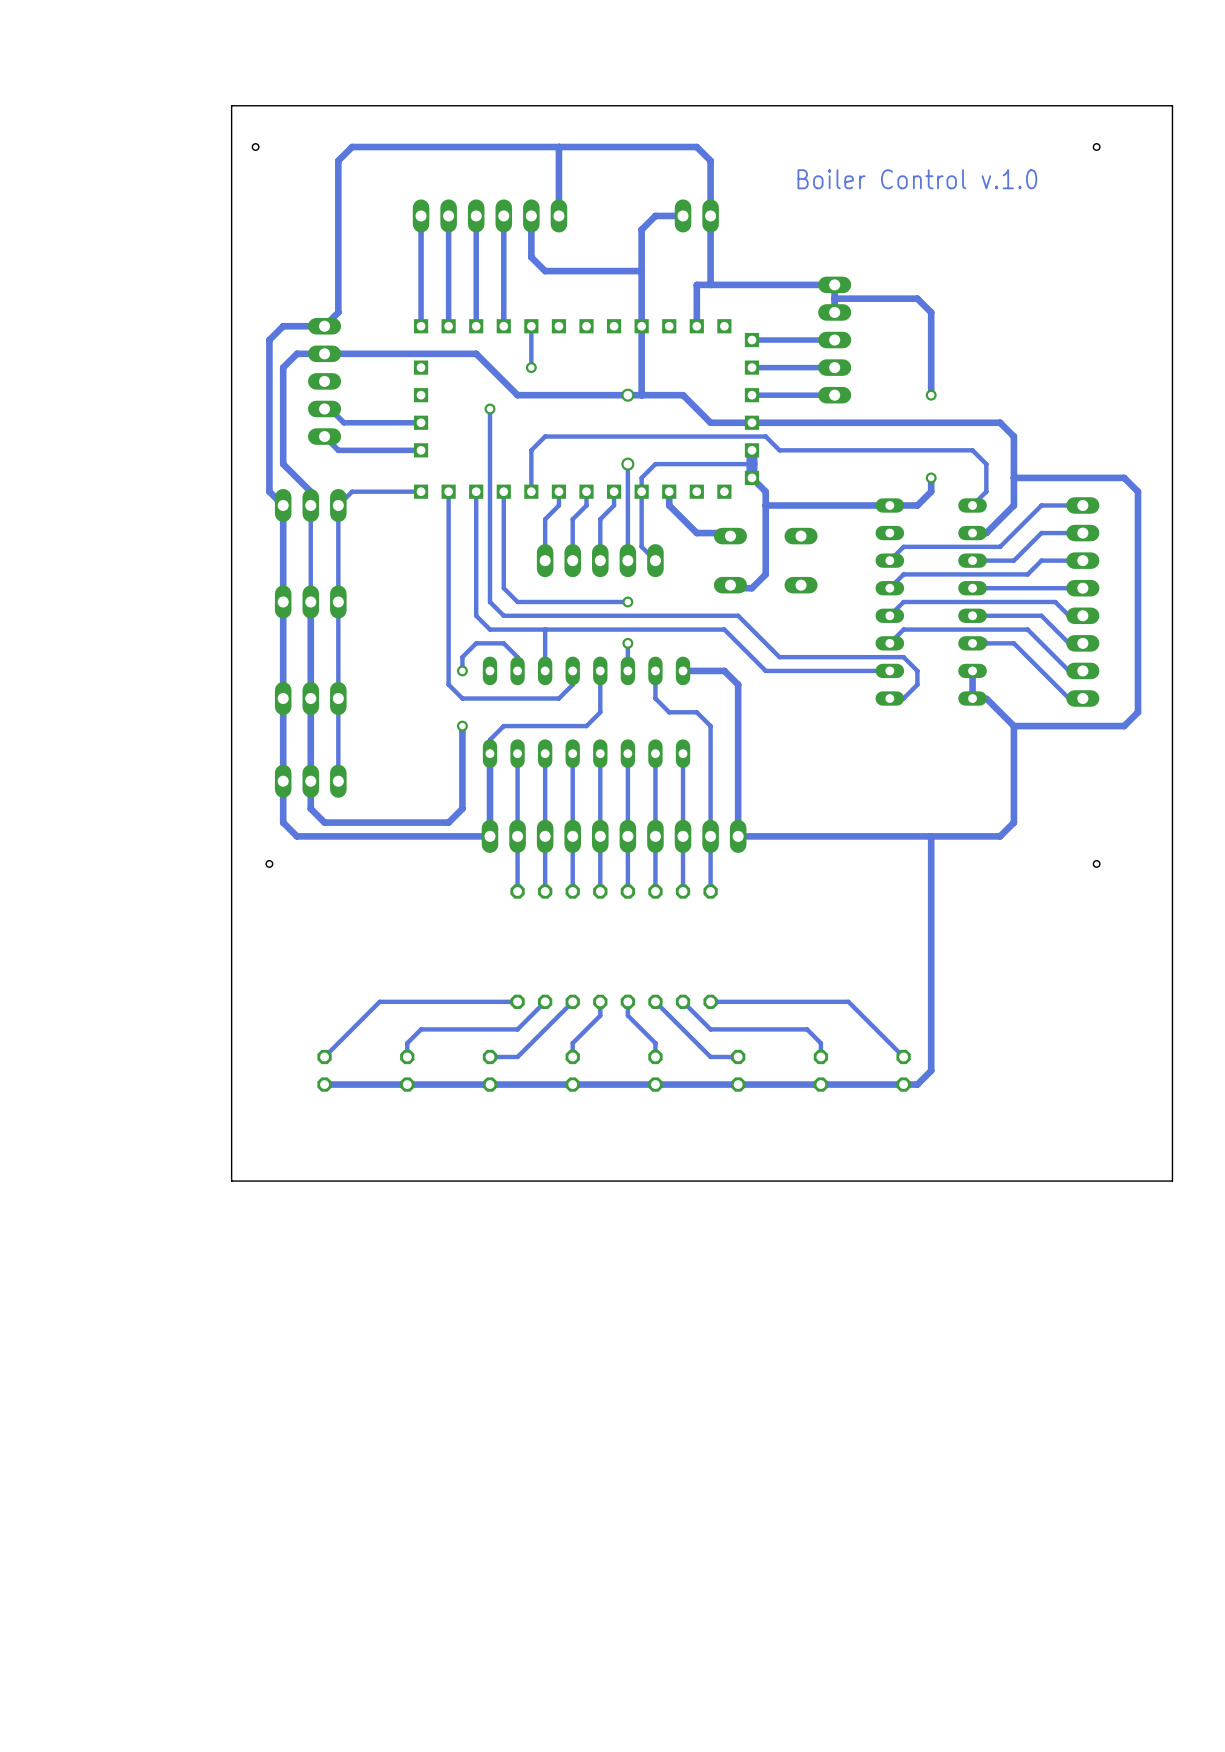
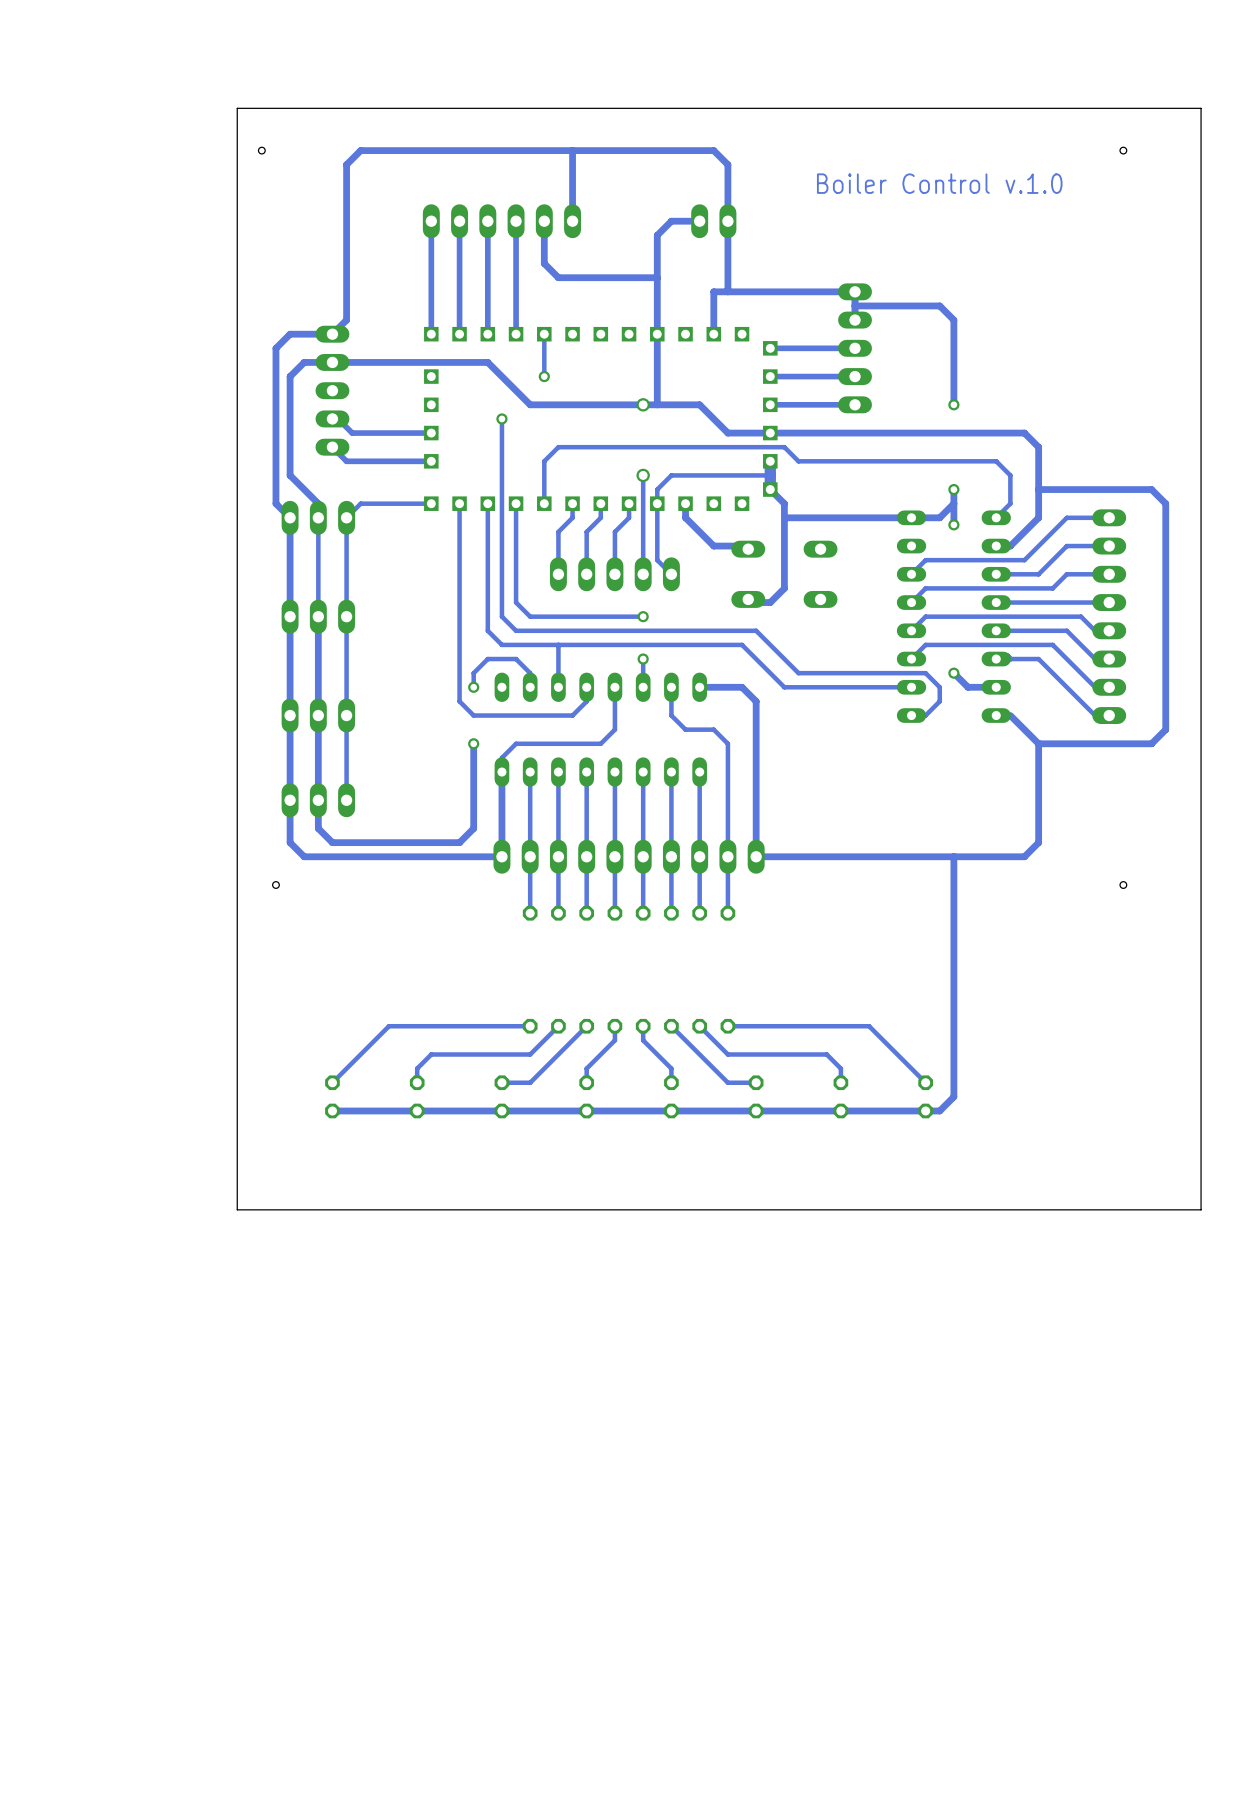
track: none -> (953, 503) (953, 524)
via: none -> (953, 524)
via: none -> (953, 673)
track: (972, 670) (972, 698) -> (996, 687) (968, 687) (953, 673)

